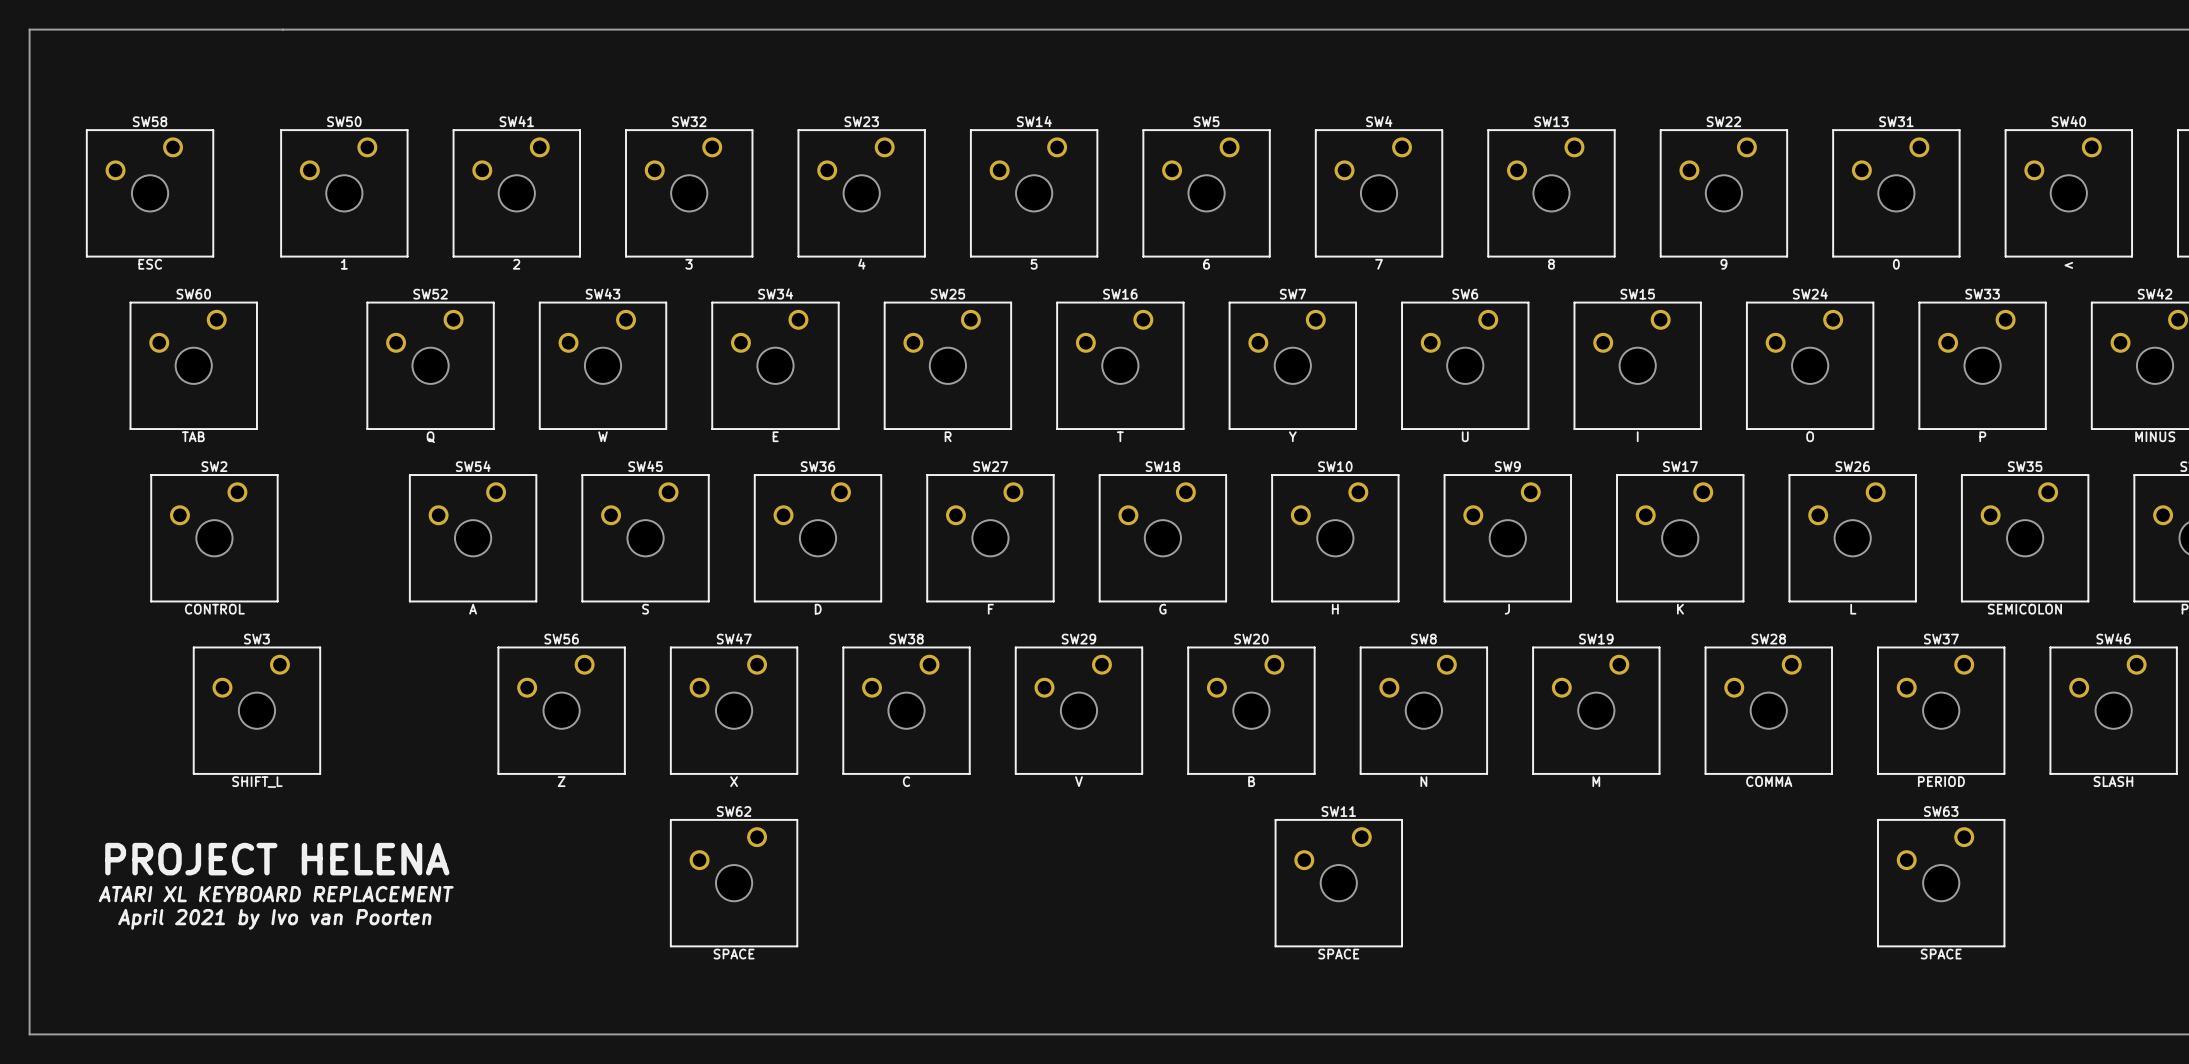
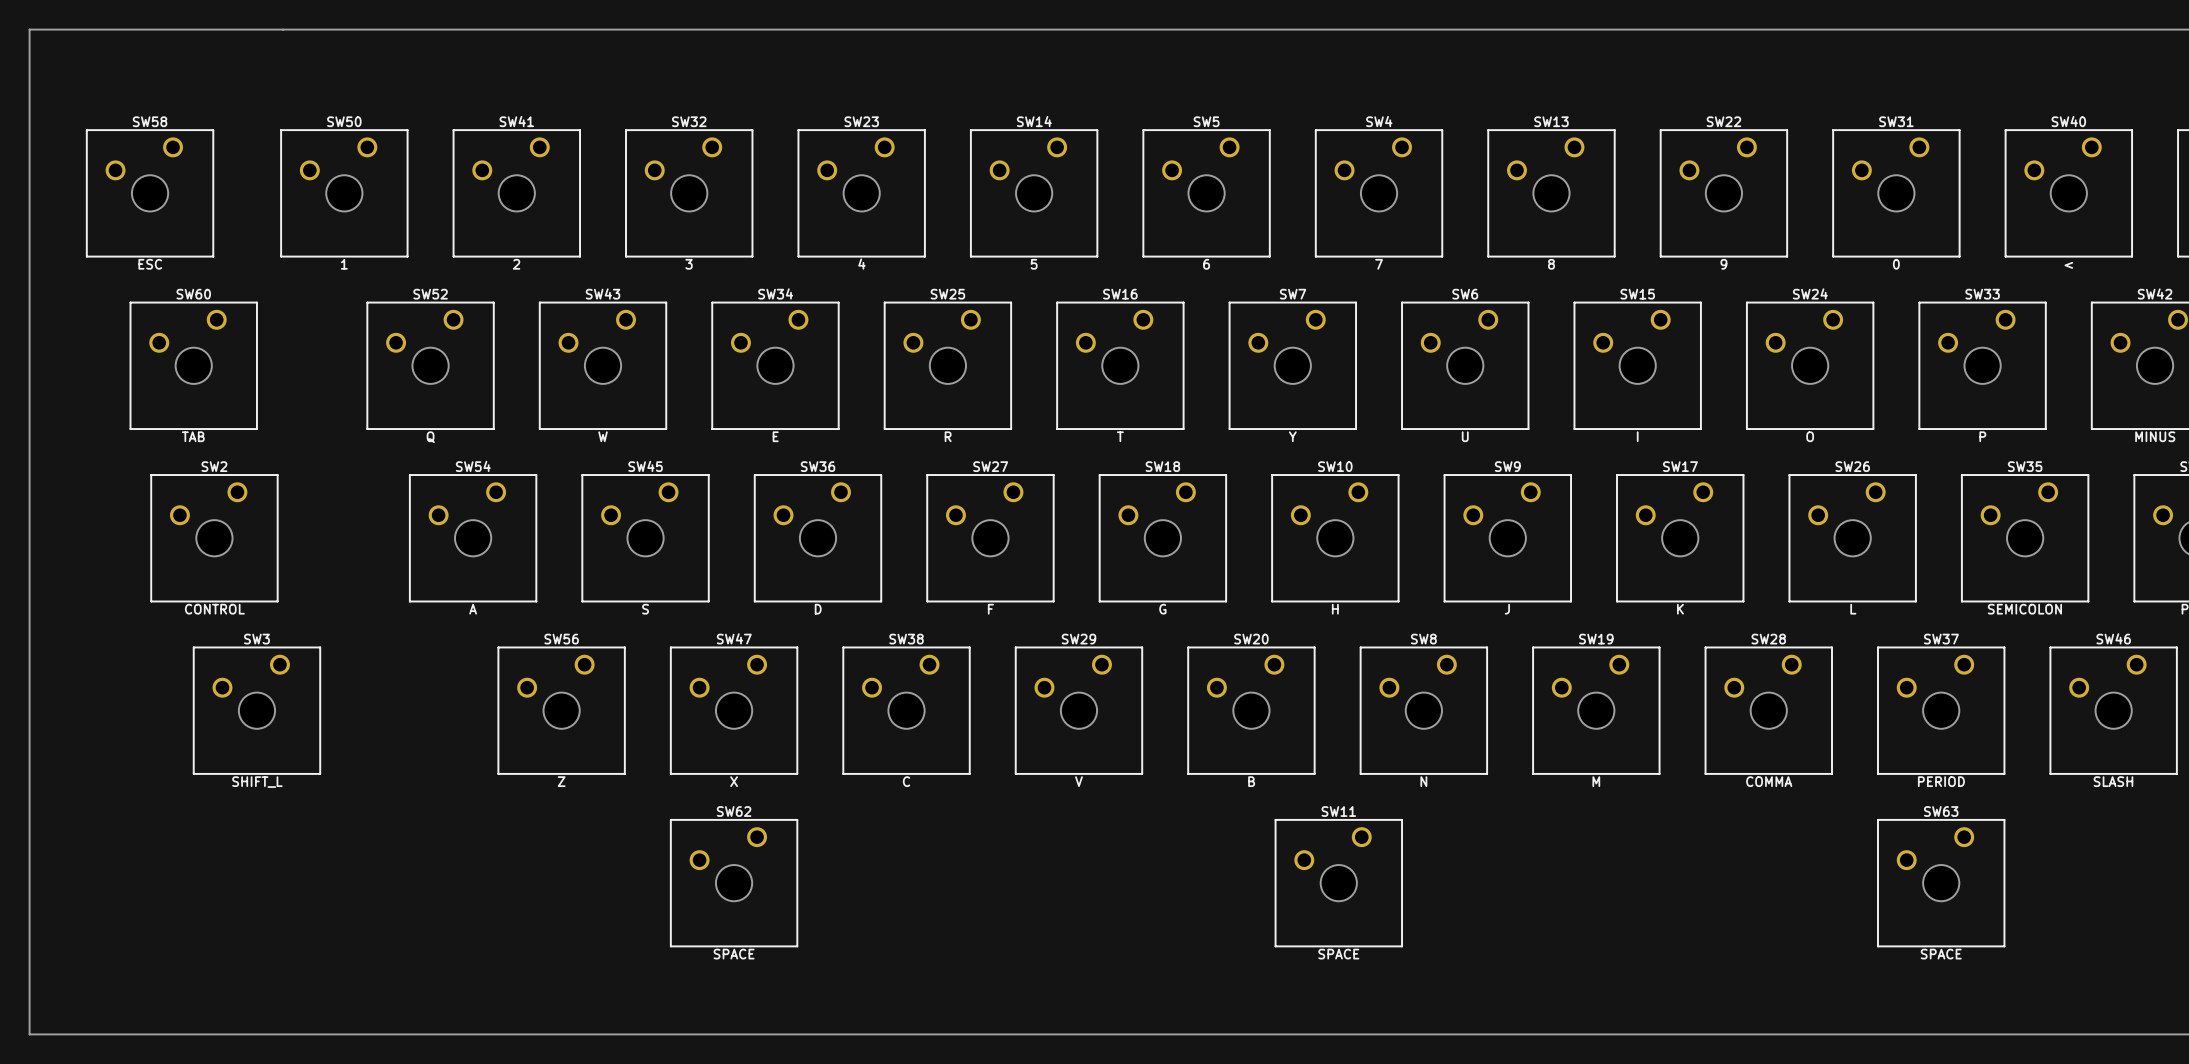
text: PROJECT HELENA (277, 859) -> none
text: ATARI XL KEYBOARD REPLACEMENT (276, 894) -> none
text: April 2021 by Ivo van Poorten (274, 919) -> none

